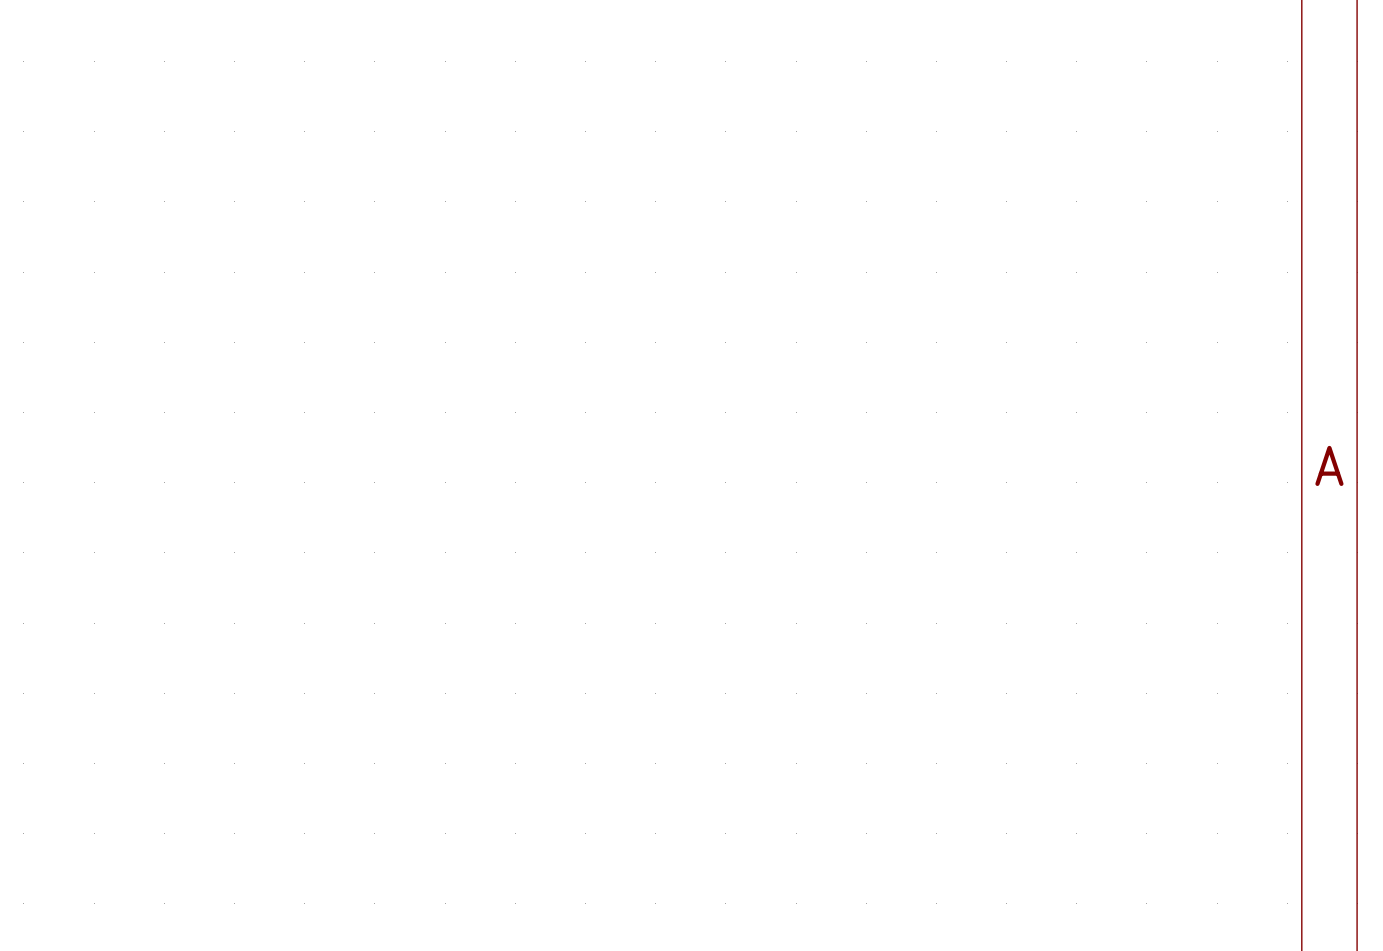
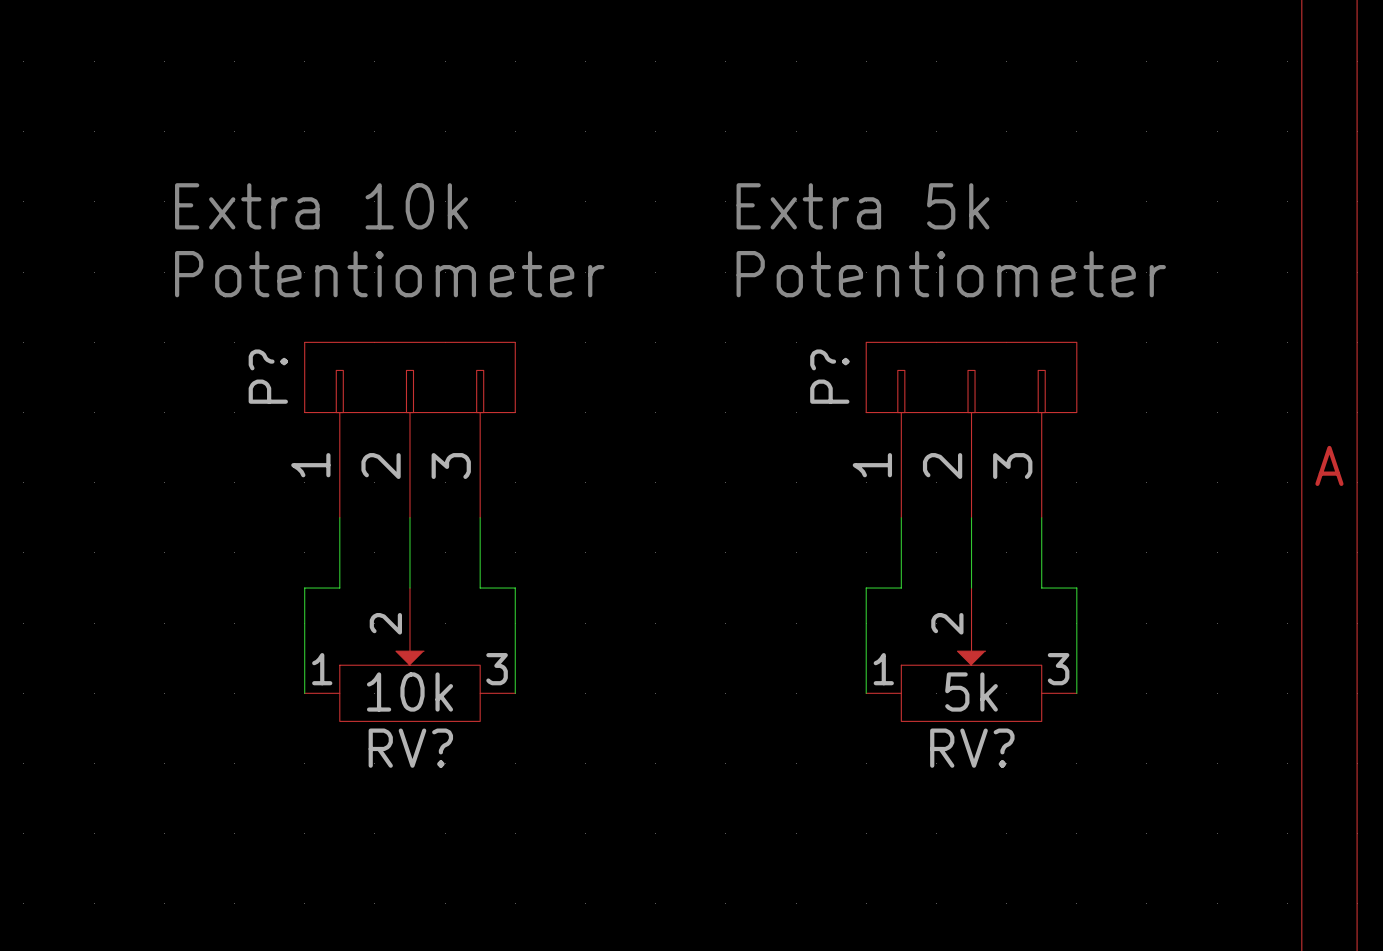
text: none -> Extra 10k (321, 206)
text: none -> Extra 5k (862, 206)
text: none -> Potentiometer (389, 274)
text: none -> Potentiometer (951, 274)
P?: none -> (409, 430)
P?: none -> (971, 430)
wire: none -> (339, 517) (339, 588) (304, 588) (304, 693)
wire: none -> (409, 517) (409, 588)
wire: none -> (480, 517) (480, 588) (515, 588) (515, 693)
wire: none -> (901, 517) (901, 588) (866, 588) (866, 693)
wire: none -> (971, 517) (971, 588)
wire: none -> (1041, 517) (1041, 588) (1076, 588) (1076, 693)
RV?: none -> 10k (409, 654)
RV?: none -> 5k (971, 654)

